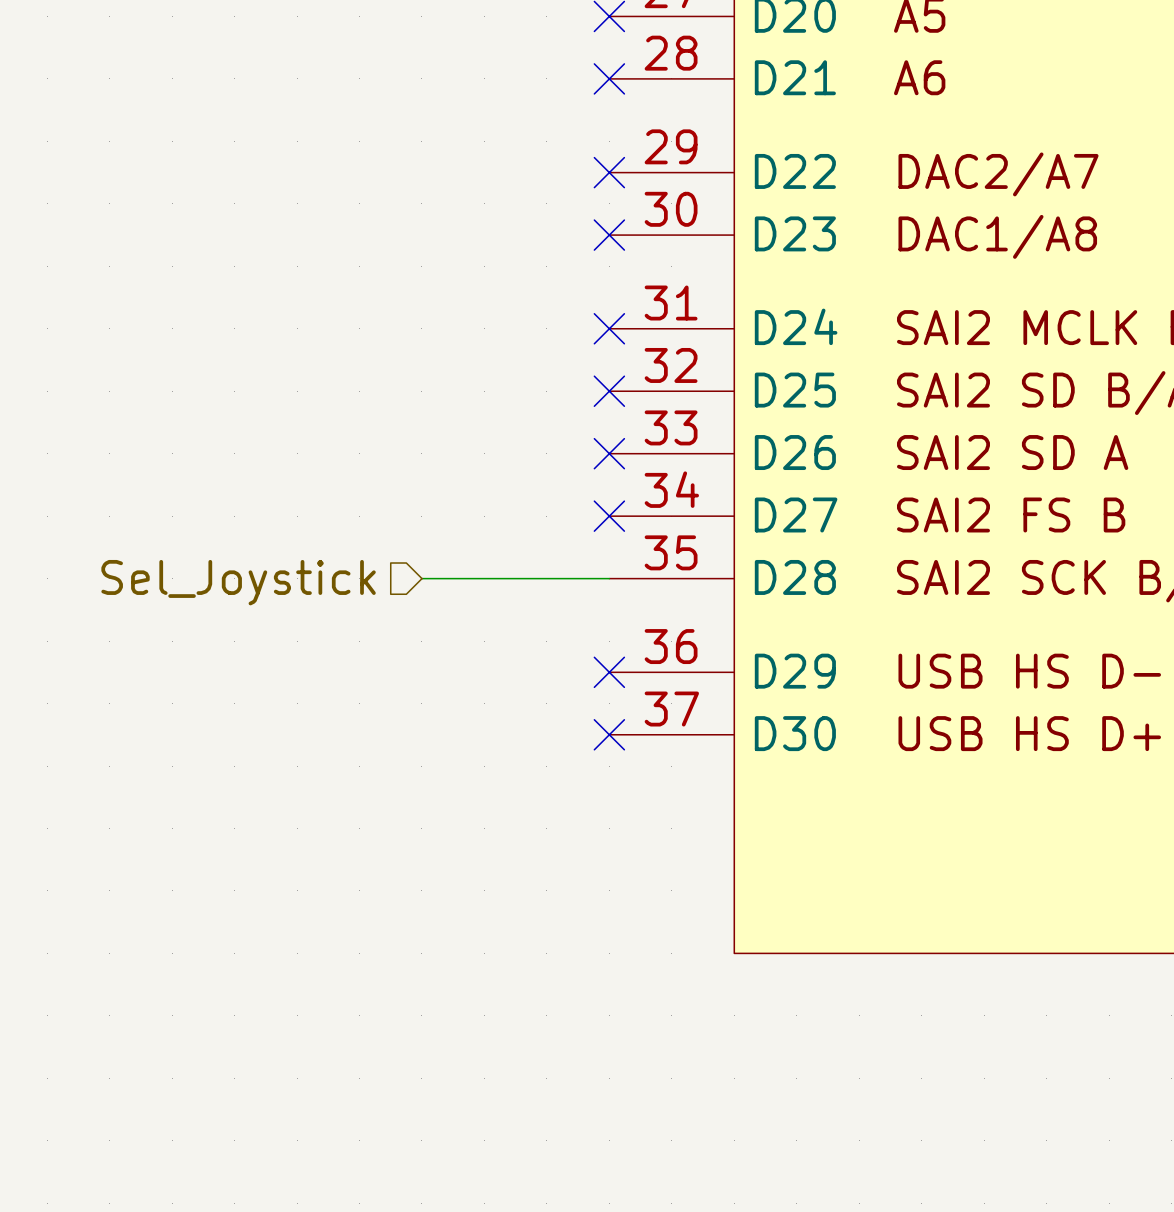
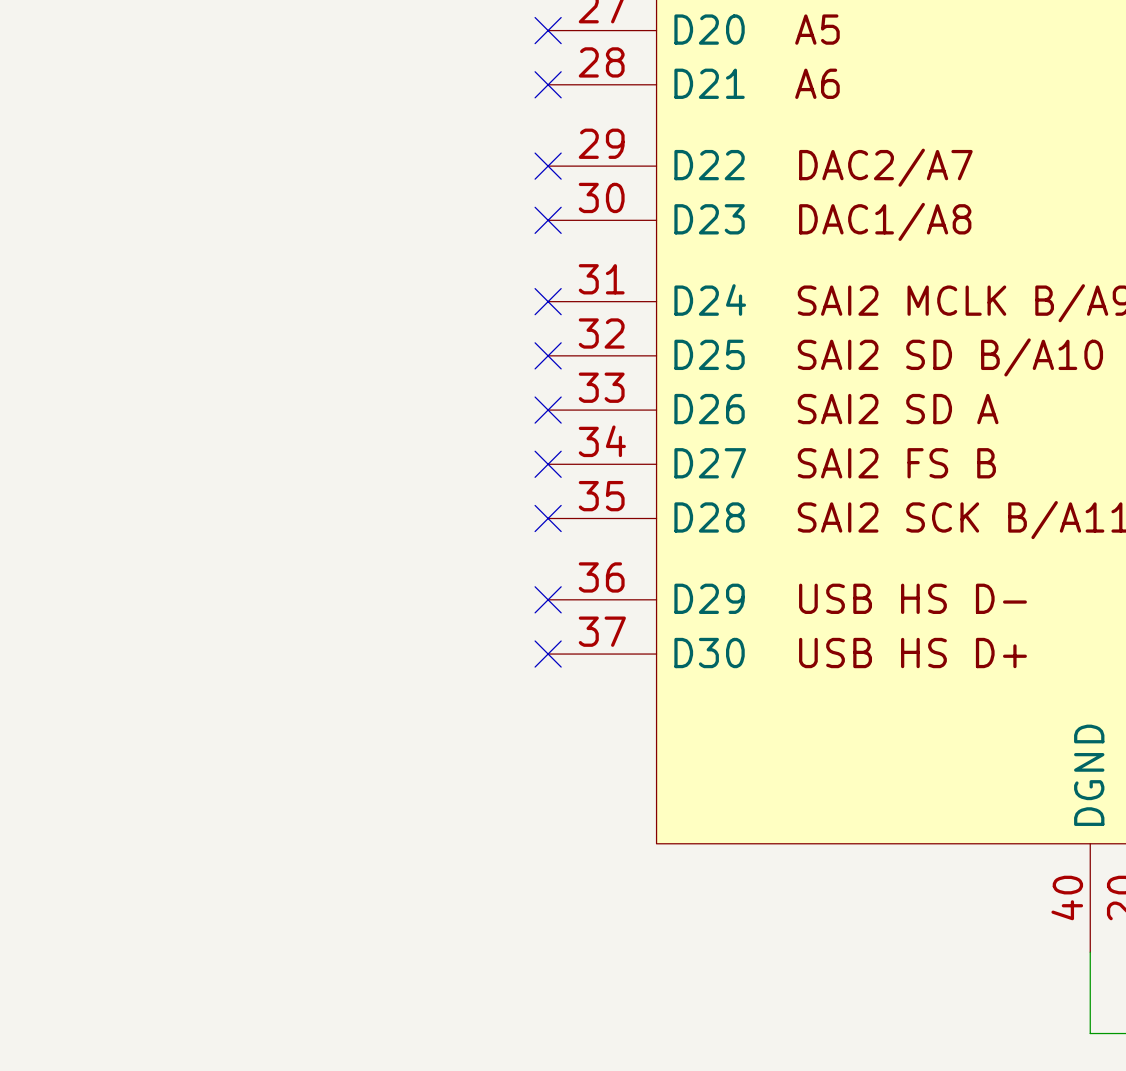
wire: (421, 578) (609, 578) -> none
no-connect mark: none -> (548, 518)
hierarchical label: Sel_Joystick (238, 582) -> none

